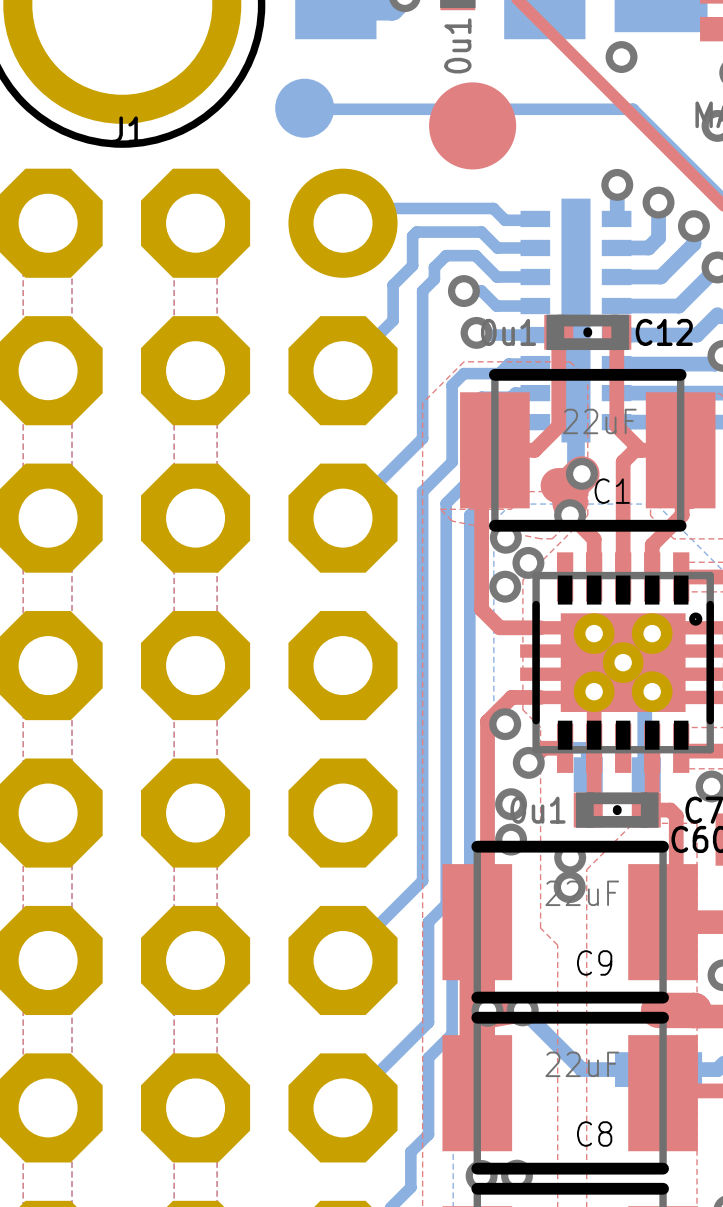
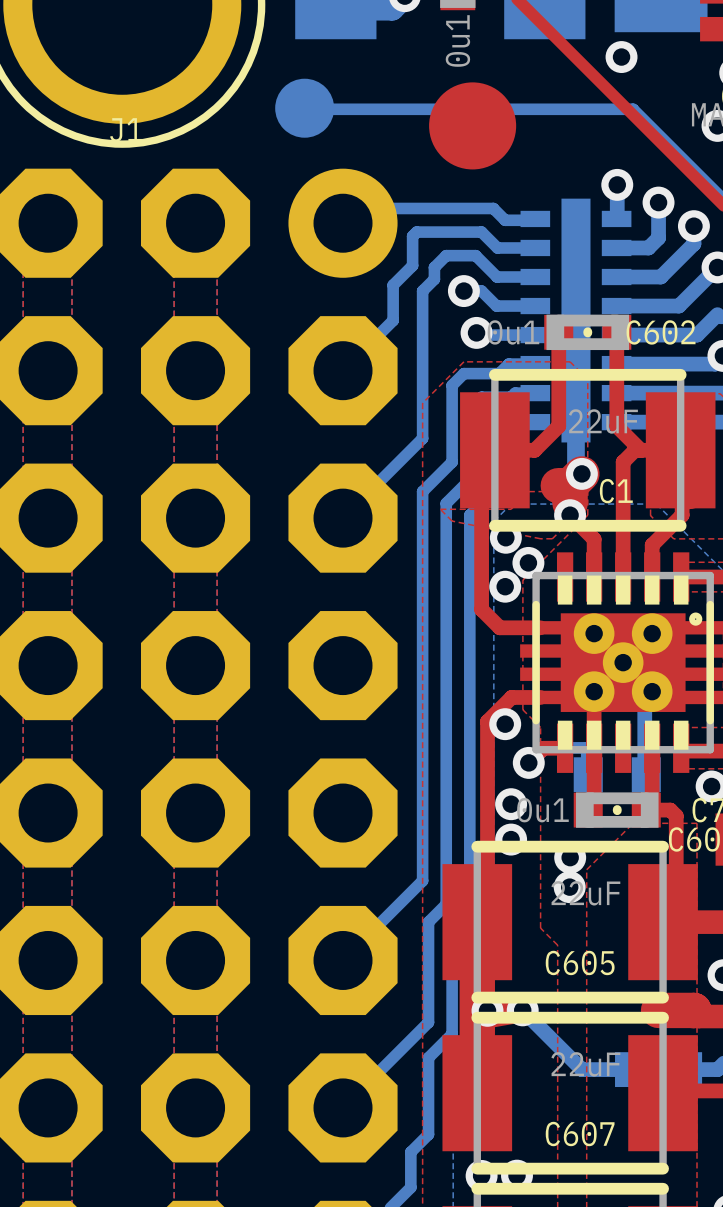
C12 name: C12 (664, 332) -> C602 (661, 332)
C9 name: C9 (594, 962) -> C605 (580, 962)
C8 name: C8 (594, 1134) -> C607 (580, 1134)

